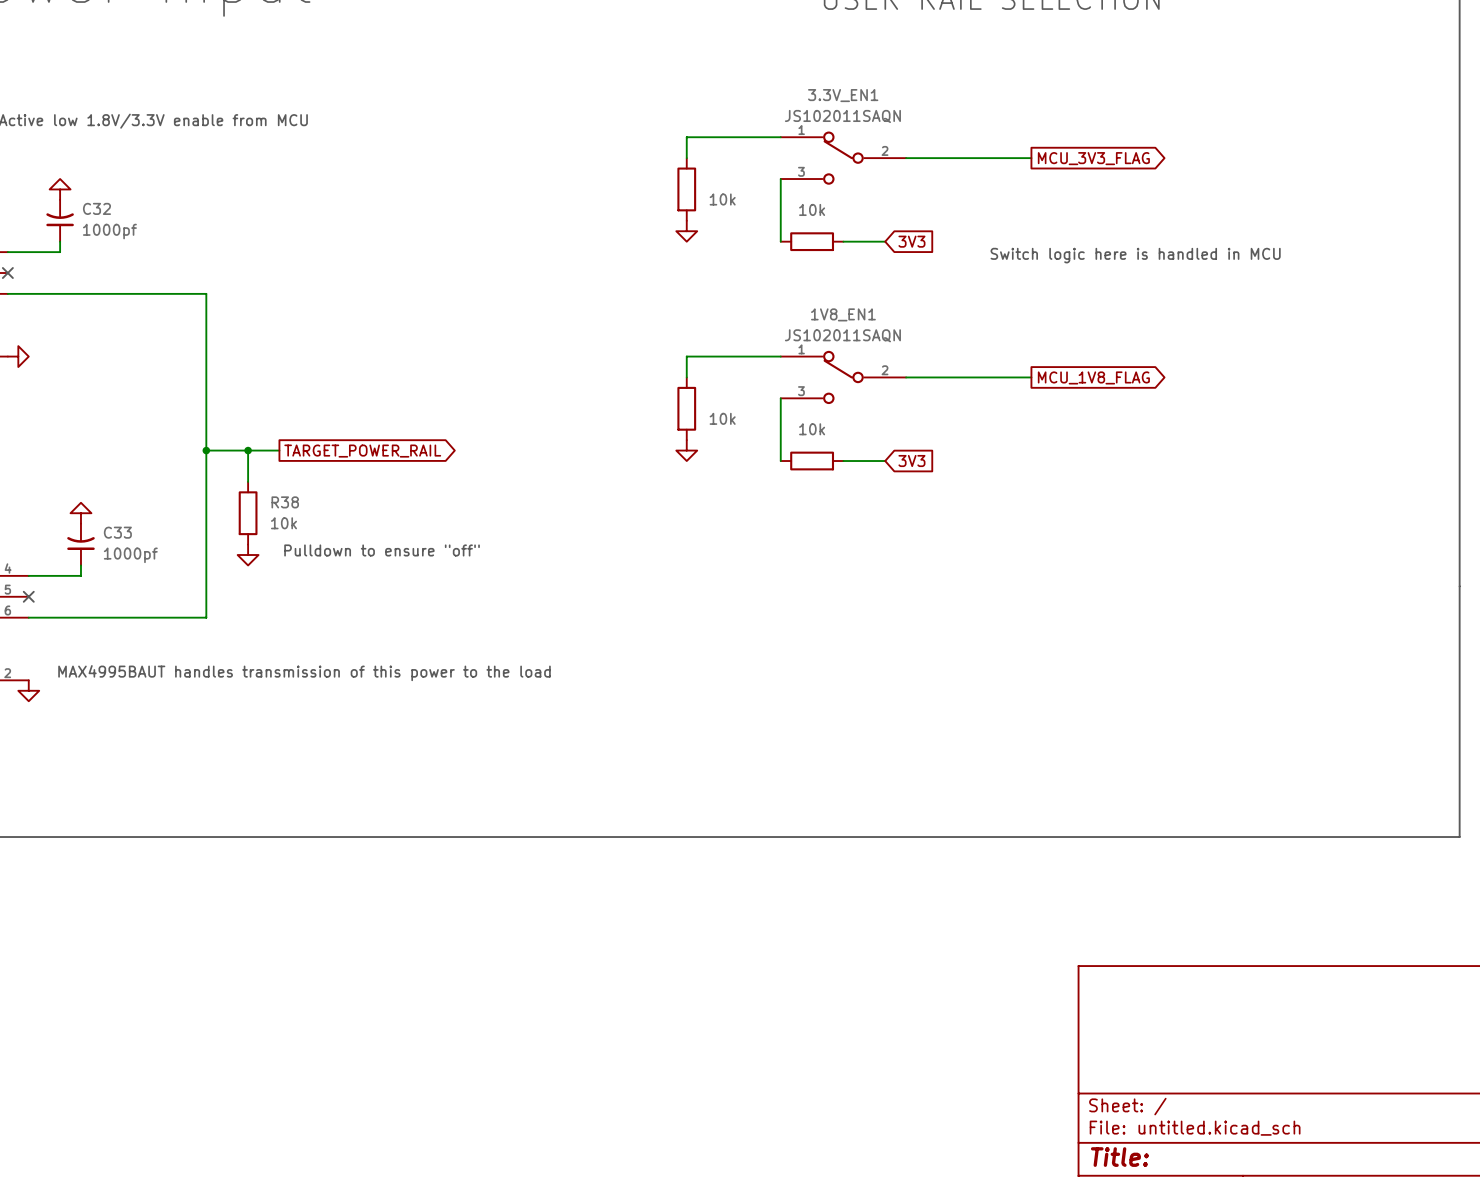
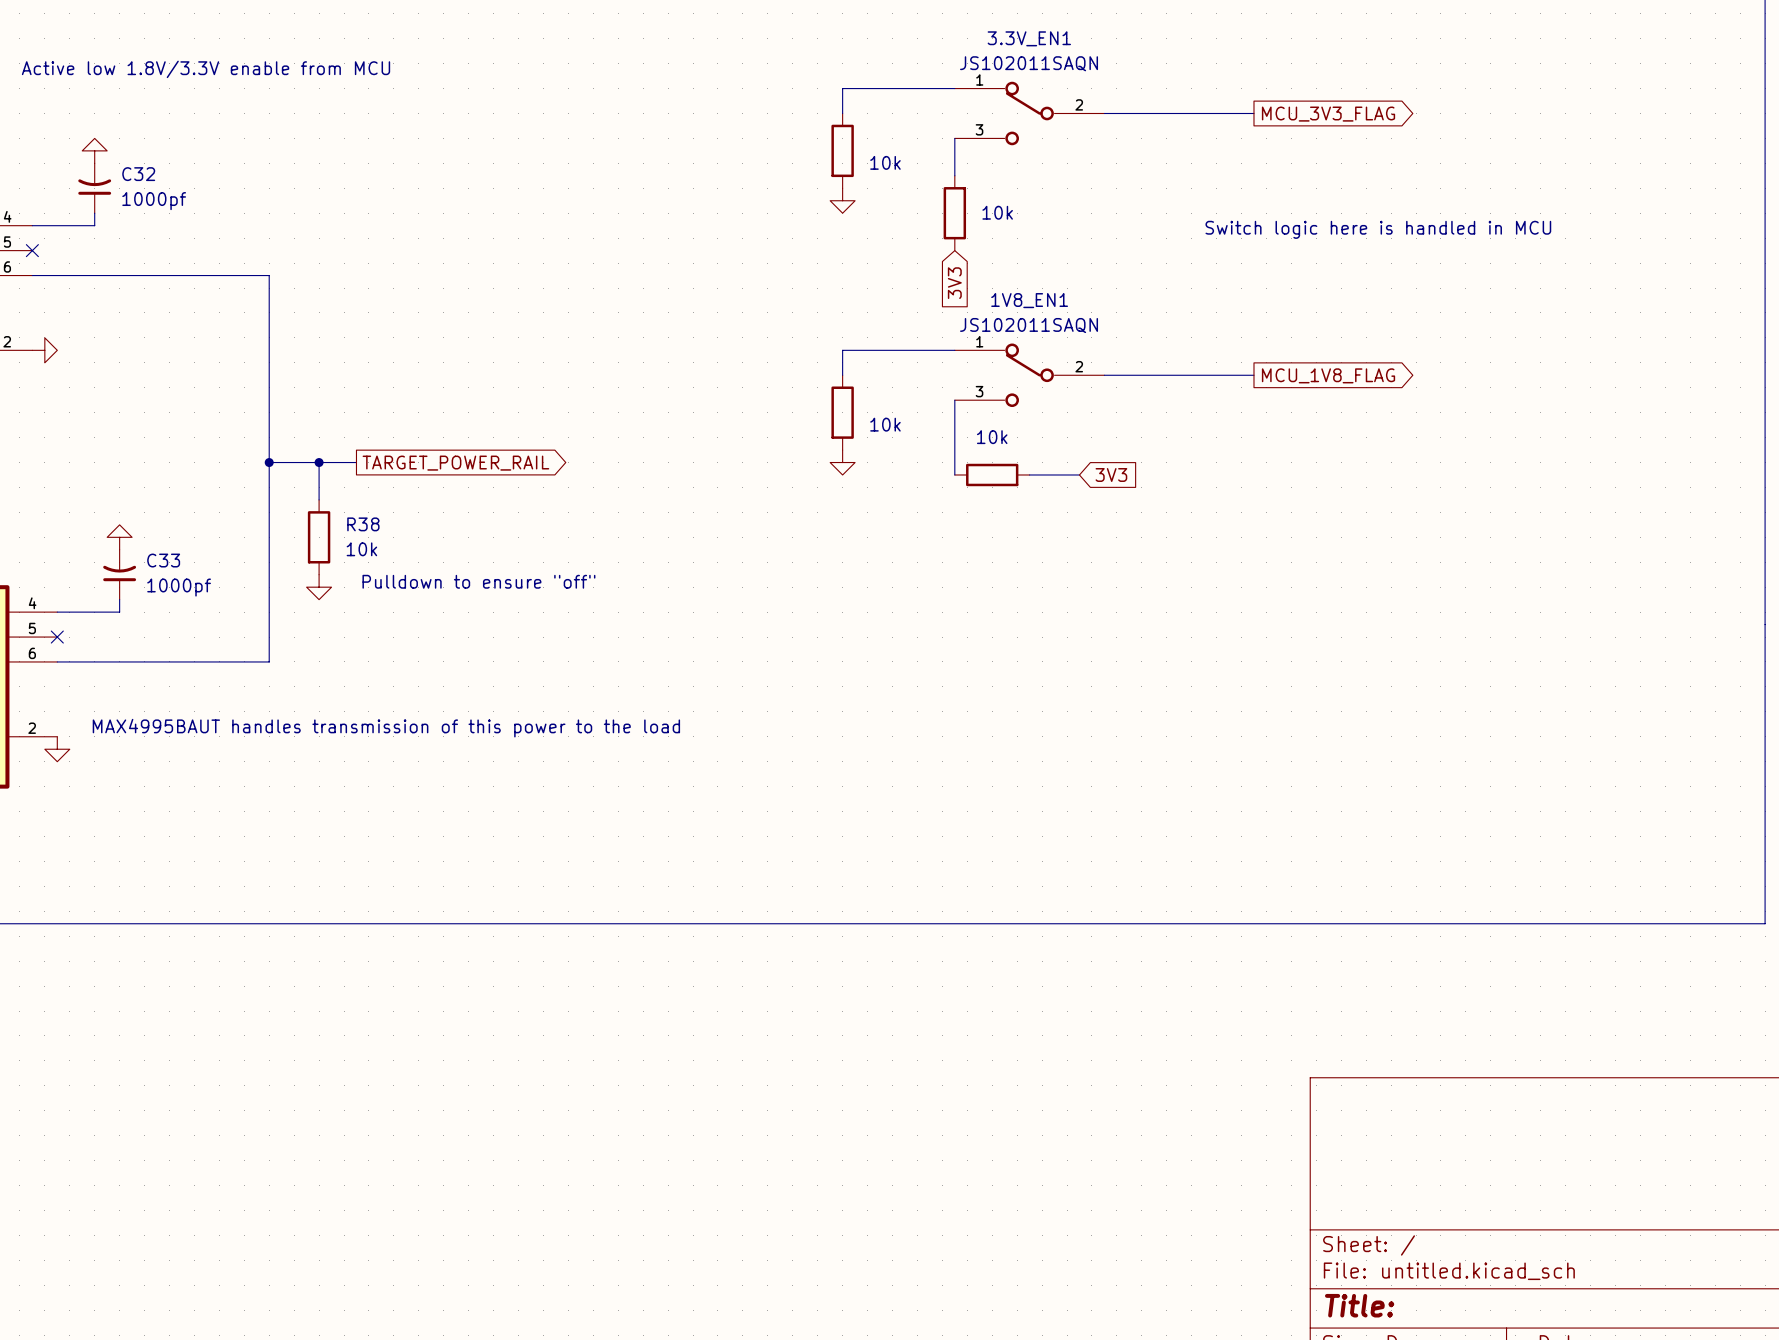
wire: (780, 210) (780, 241) -> none
part rotation: 0° (812, 241) -> 90° clockwise (954, 213)
wire: (843, 241) (885, 241) -> none
global label rotation: 0° (911, 241) -> 90° clockwise (954, 283)
global label position: 3V3 (911, 241) -> 3V3 (954, 283)

